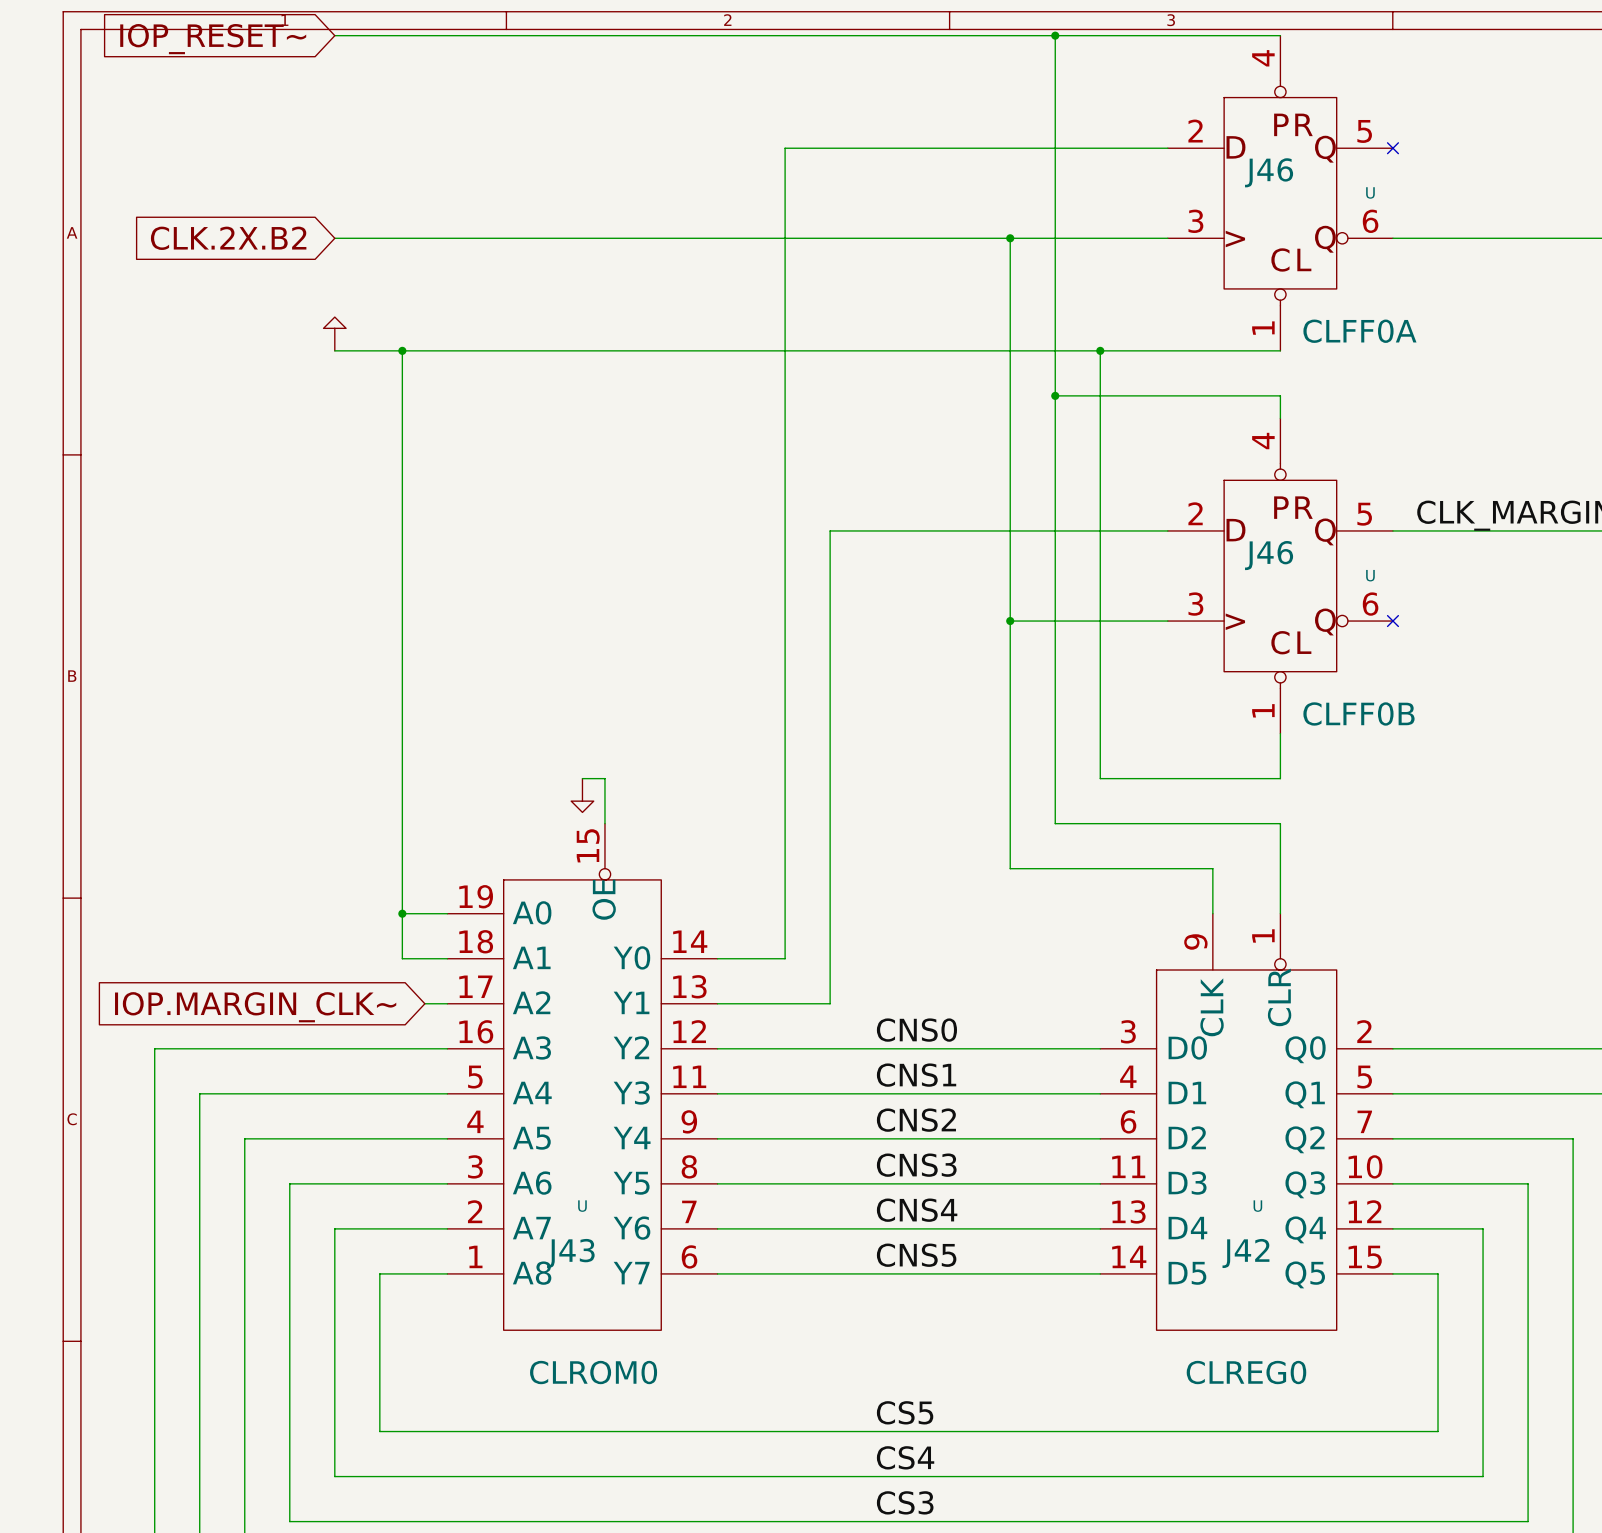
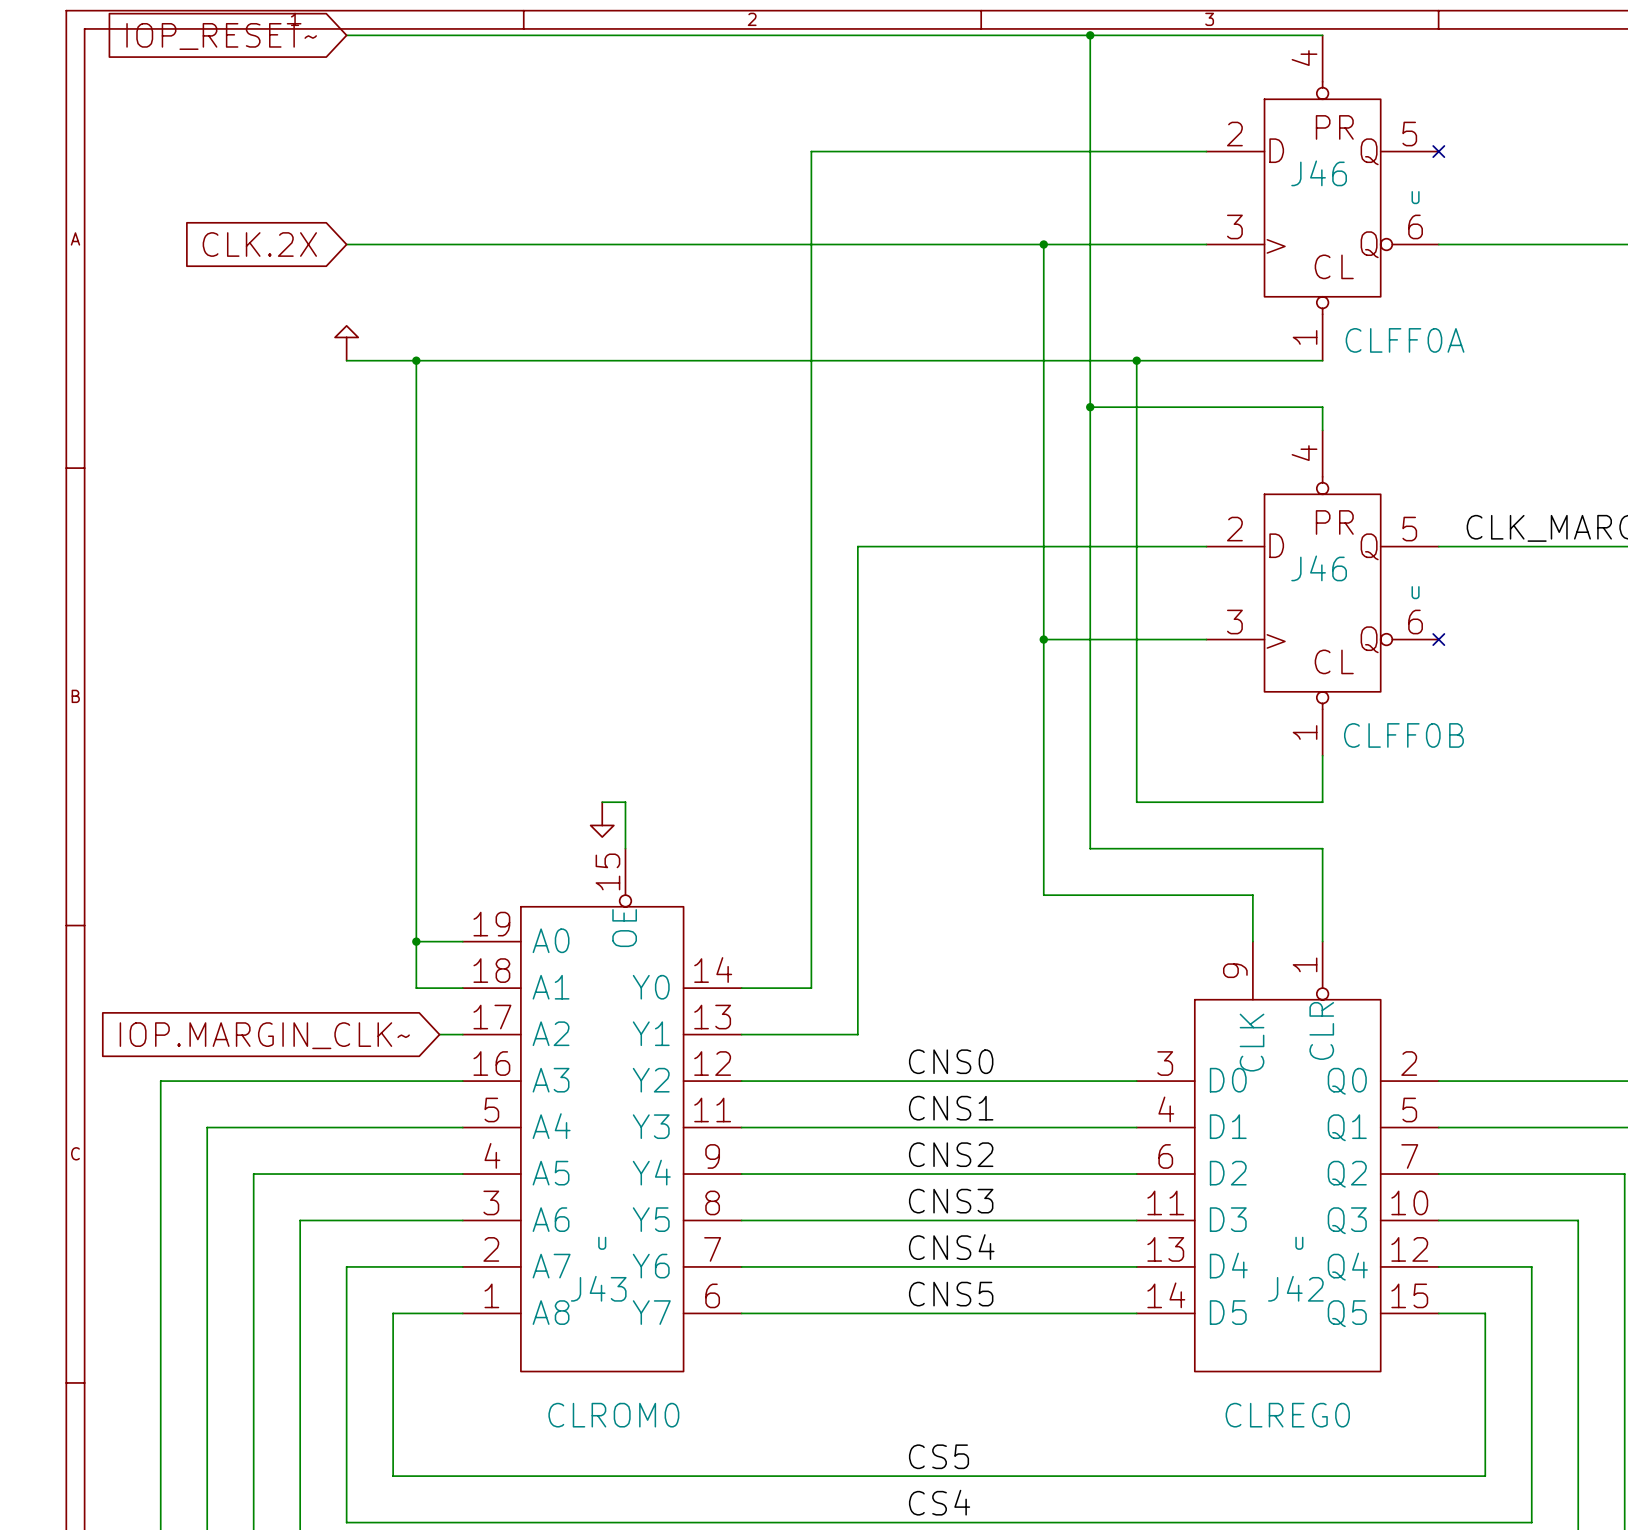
global label: CLK.2X.B2 (228, 238) -> CLK.2X (259, 244)

